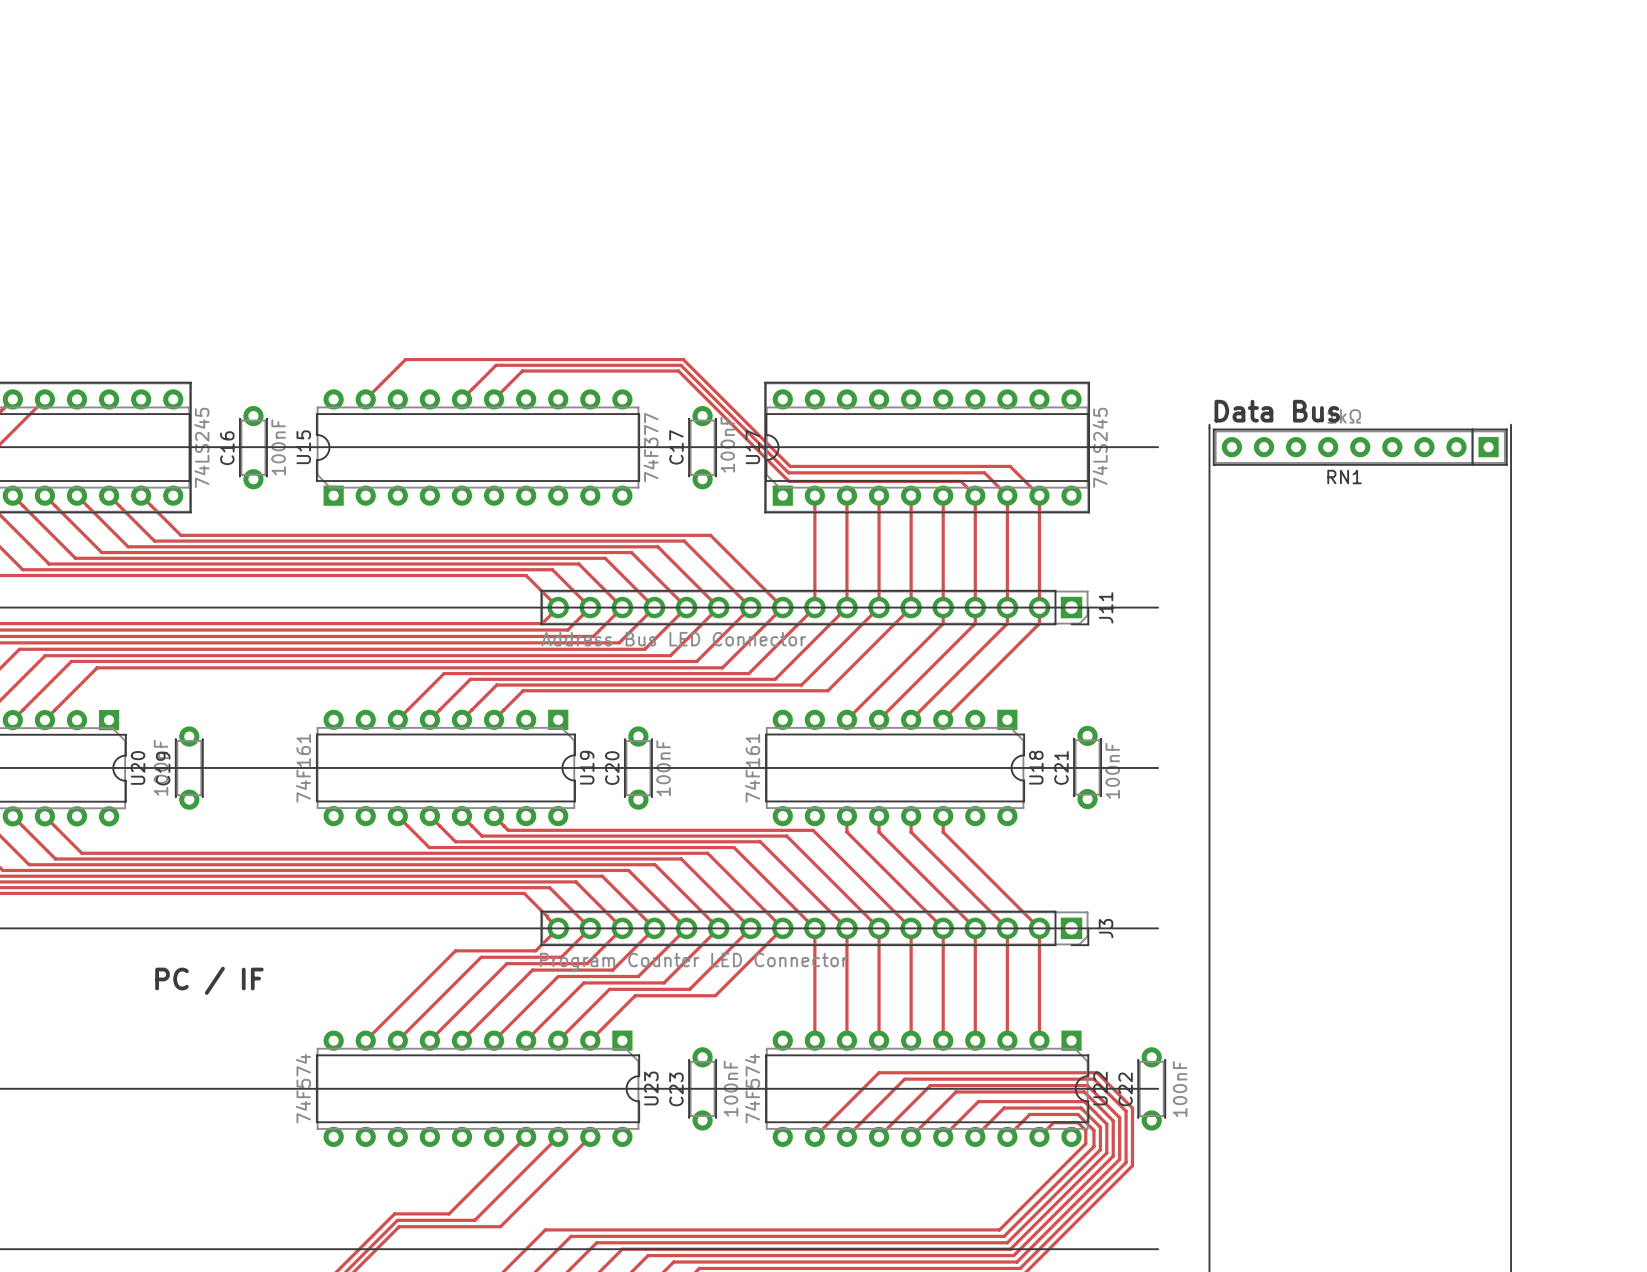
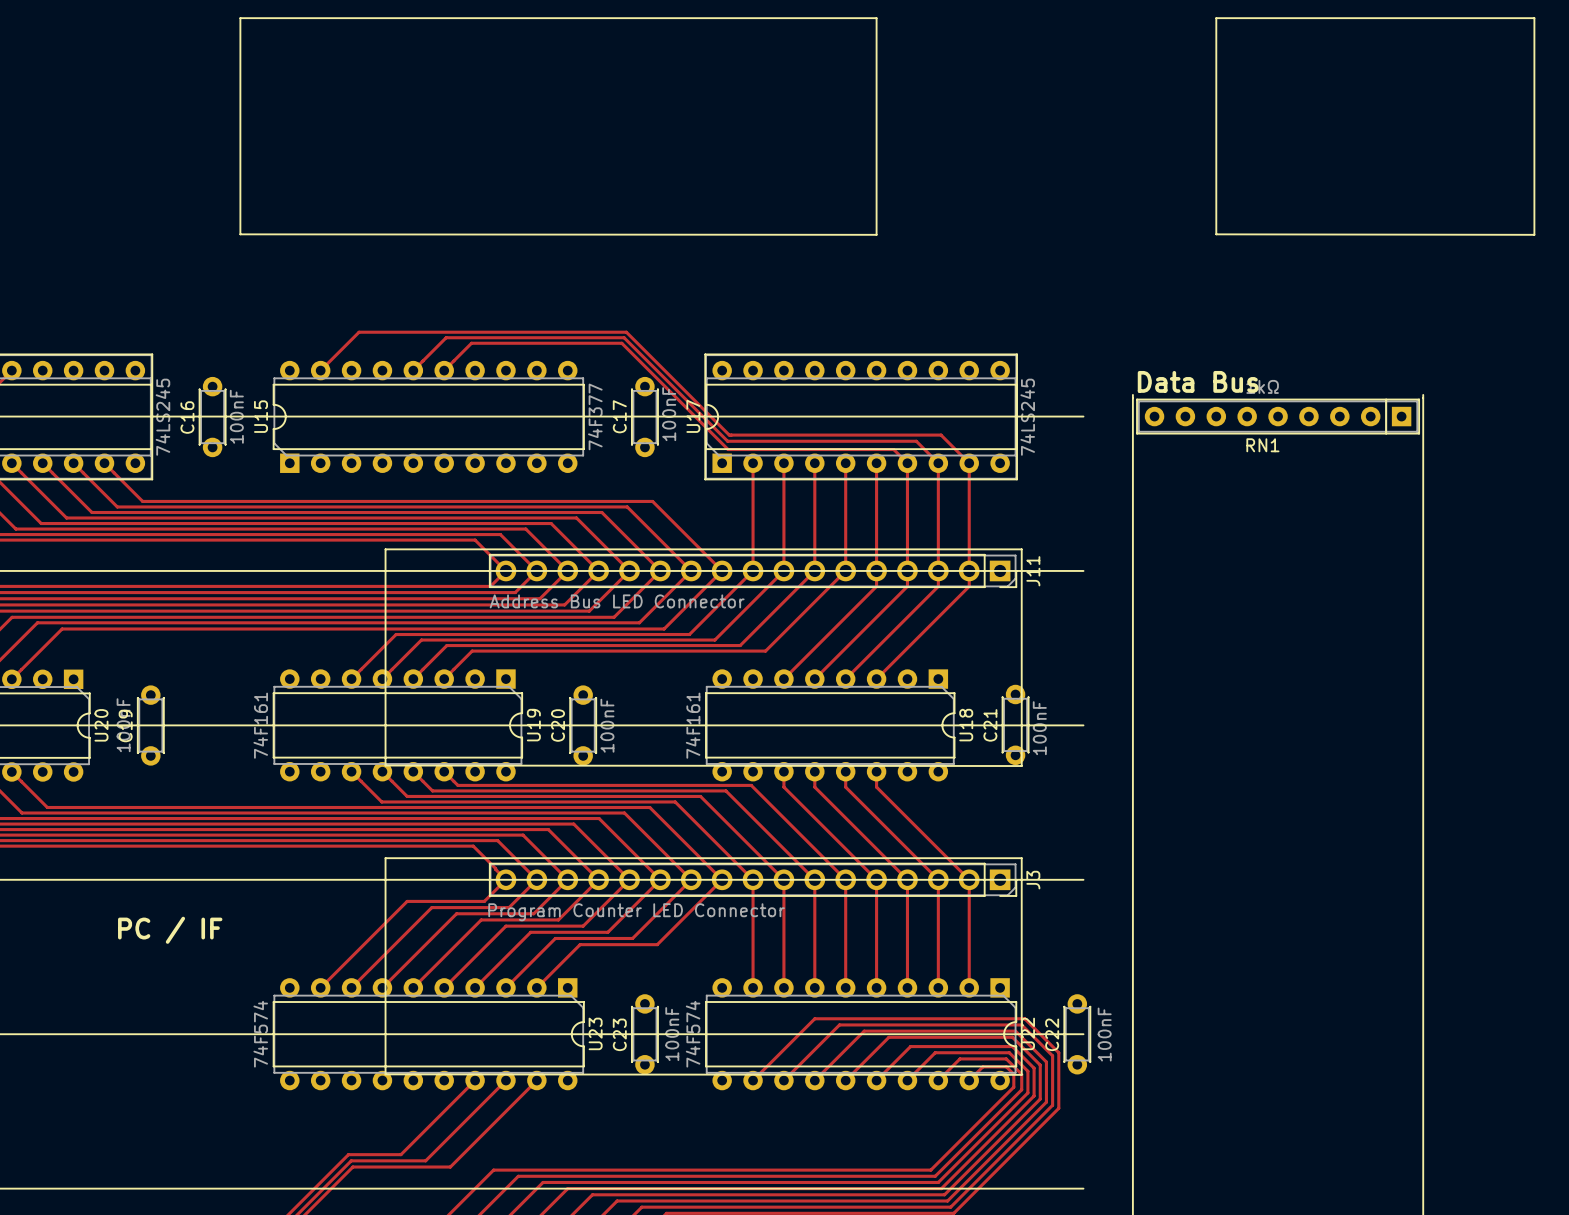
line: none -> (240, 18) (876, 18) (876, 234) (240, 234) (240, 18)
line: none -> (1216, 18) (1534, 18) (1534, 234) (1216, 234) (1216, 18)
line: none -> (385, 549) (385, 765) (1021, 766) (1021, 549) (385, 549)
line: none -> (385, 858) (385, 1074) (1021, 1074) (1021, 858) (385, 858)

